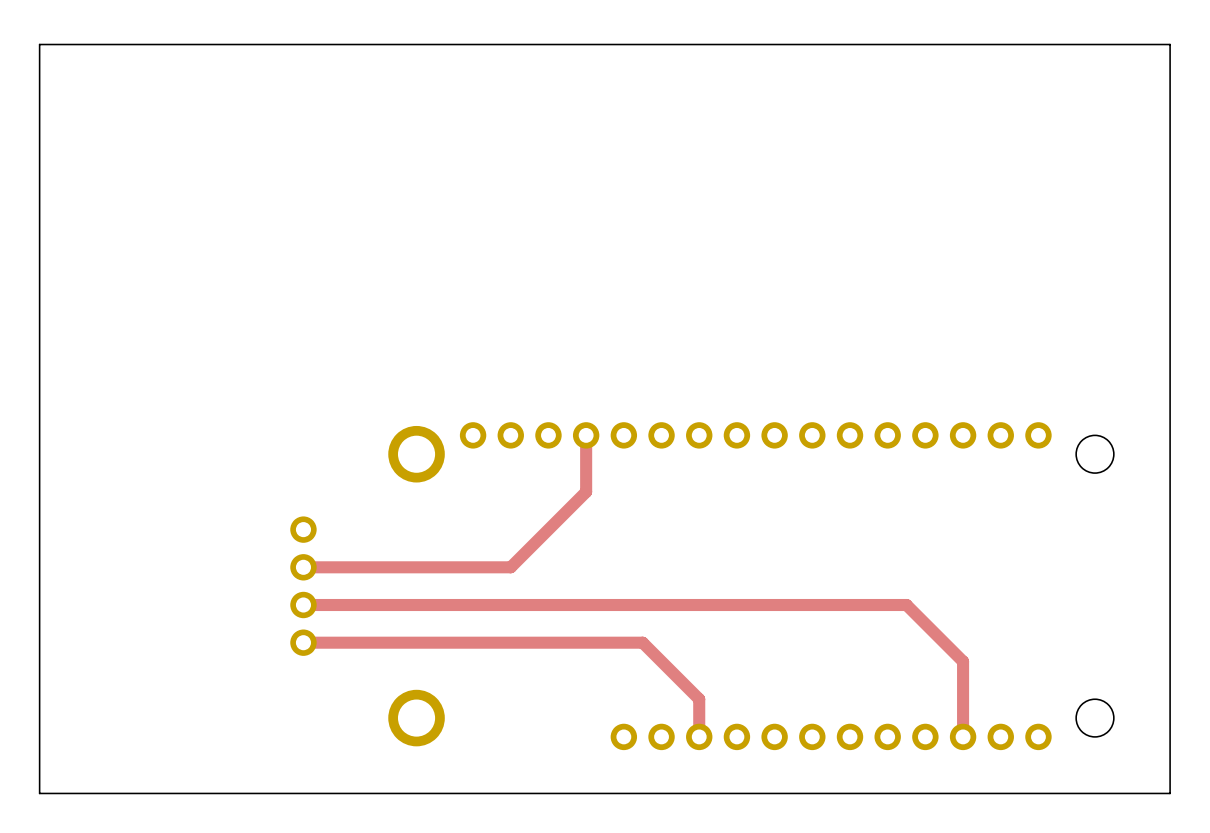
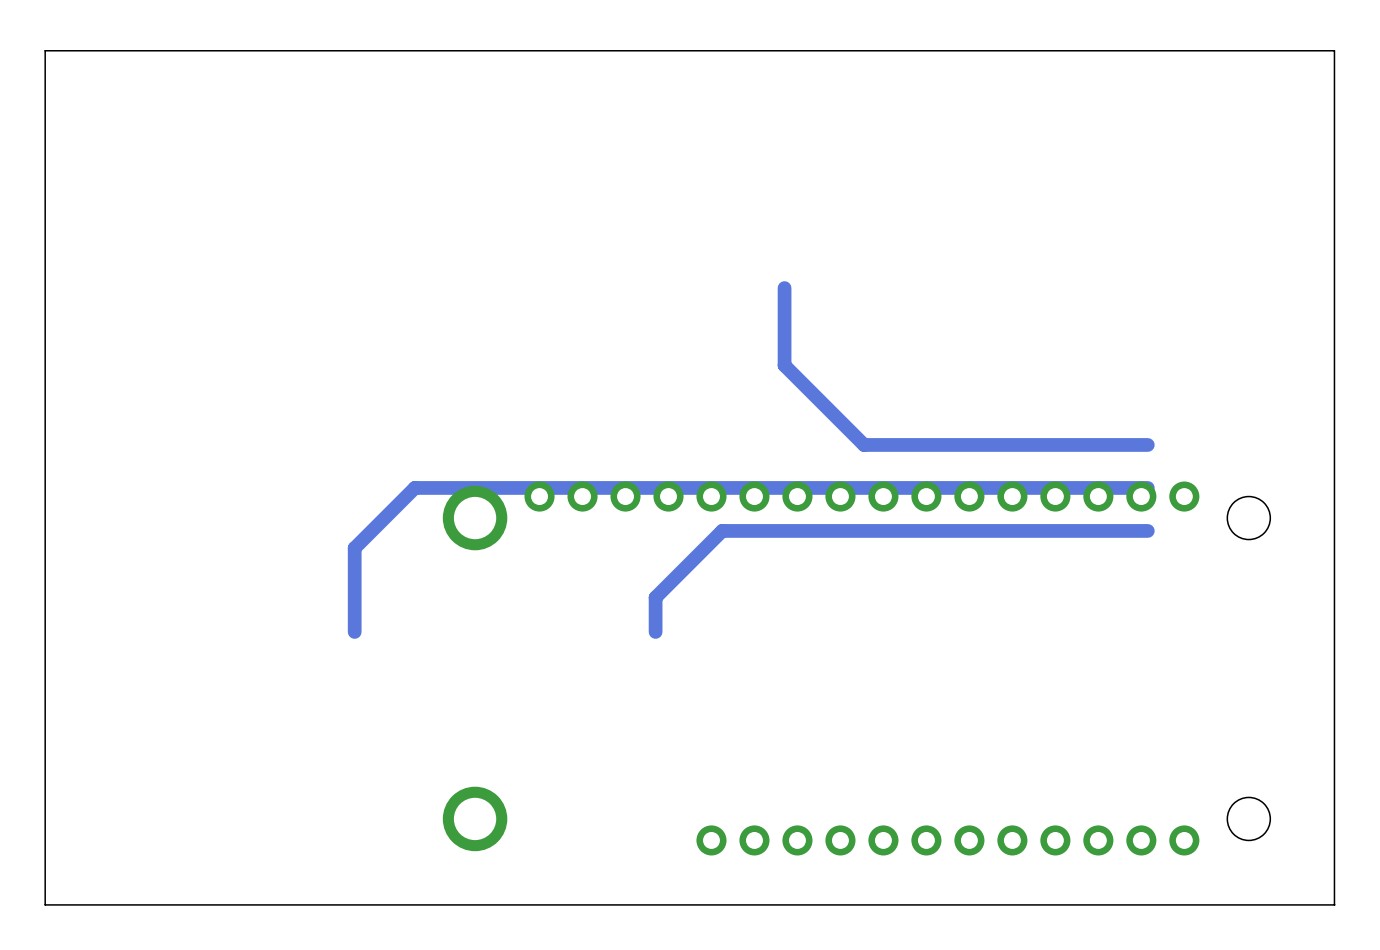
bottom track: none -> (784, 288) (784, 365) (864, 444) (1147, 444)
bottom track: none -> (1147, 487) (414, 487) (354, 548) (354, 631)
top track: (586, 435) (586, 491) (510, 567) (303, 567) -> none
bottom track: none -> (1147, 530) (722, 530) (655, 597) (655, 631)
part: (303, 586) -> none
top track: (303, 605) (906, 605) (963, 661) (963, 736) -> none
top track: (303, 642) (642, 642) (699, 699) (699, 736) -> none

